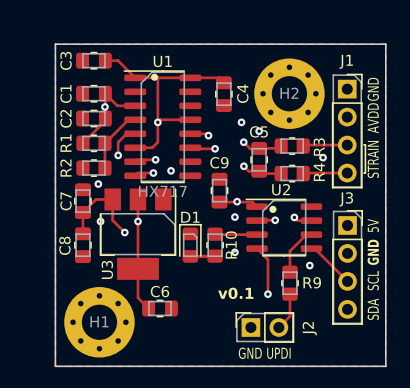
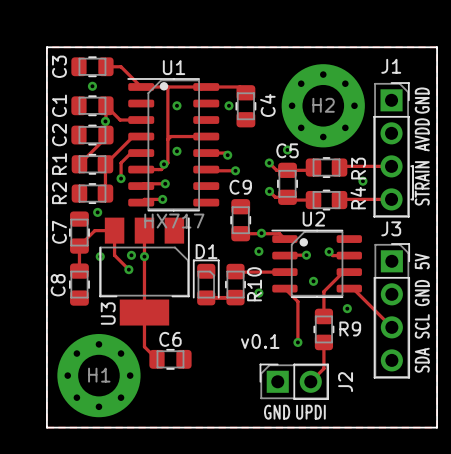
via: none -> (92, 86)
via: none -> (176, 105)
via: none -> (229, 105)
via: (157, 122) -> none
via: (241, 122) -> none
via: none -> (176, 151)
via: none -> (163, 164)
via: (171, 170) -> none
via: none -> (131, 255)
via: none -> (313, 281)

